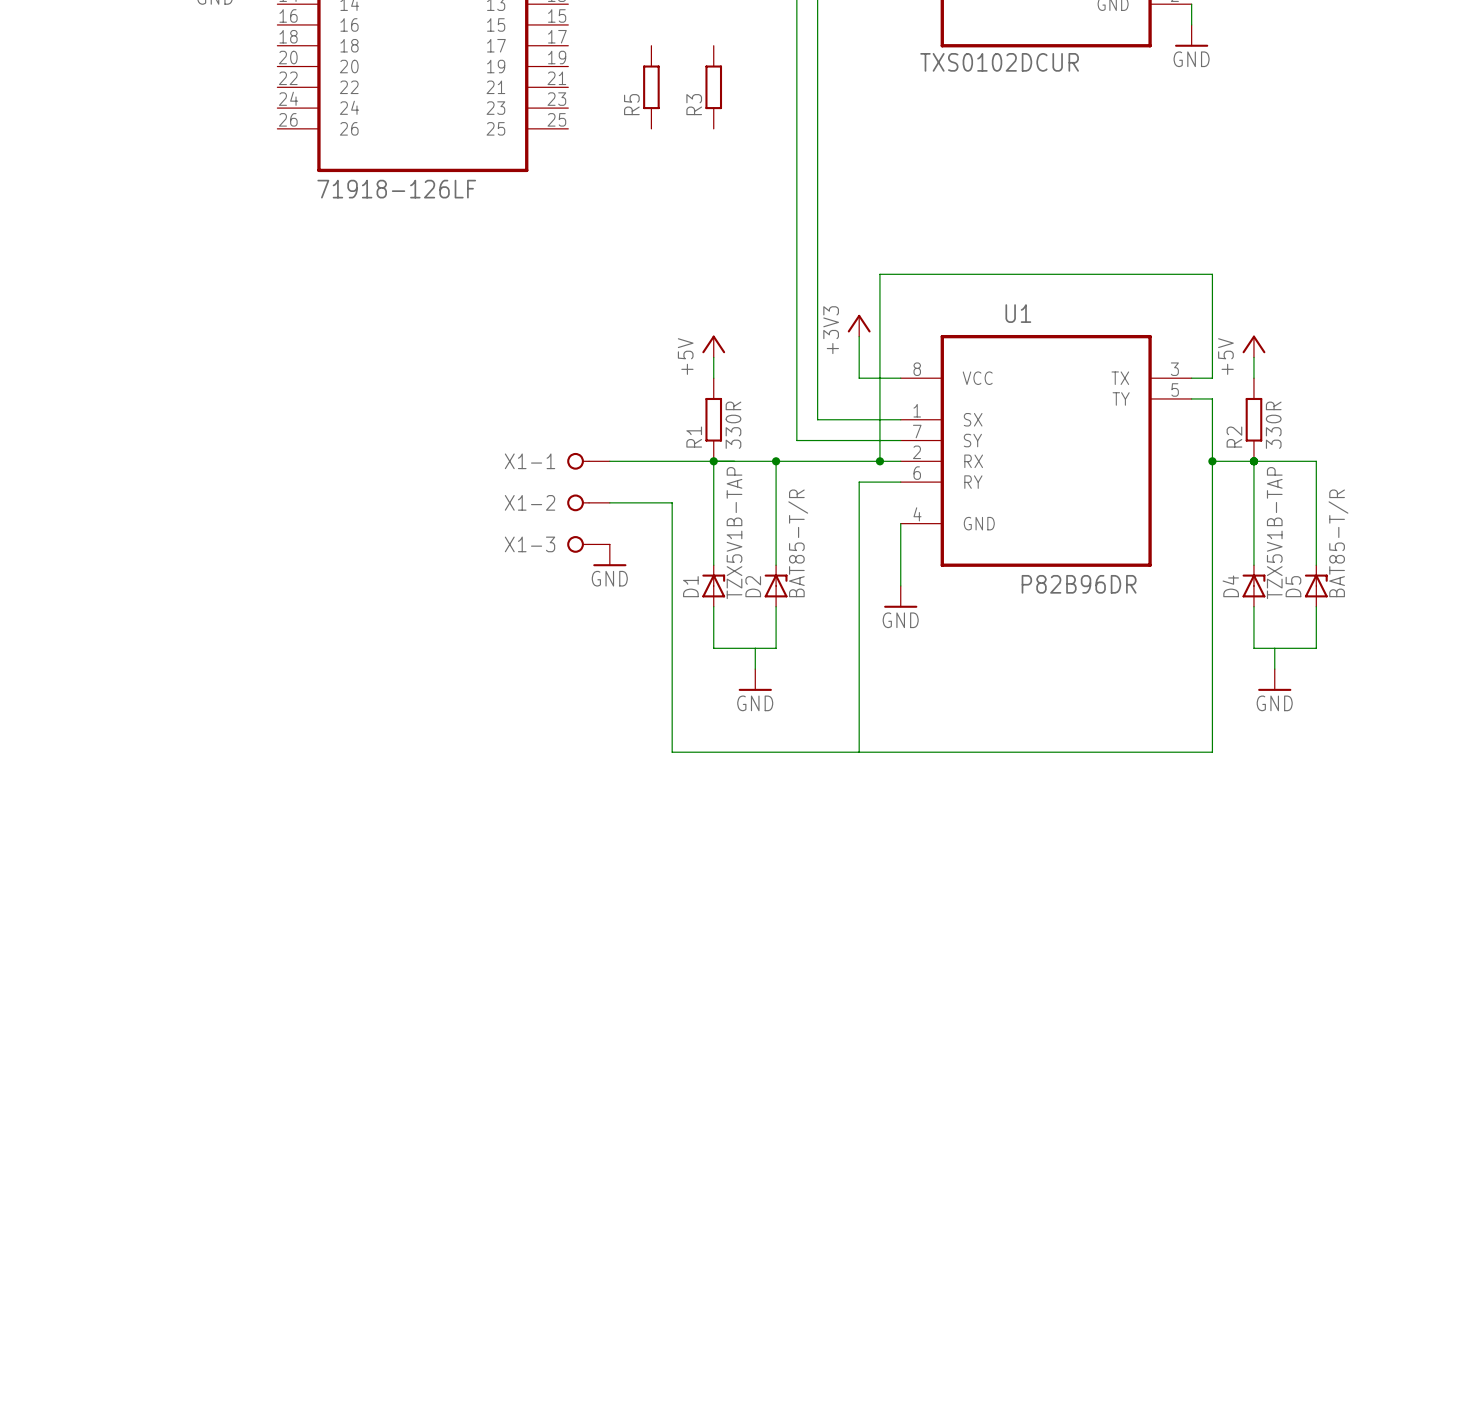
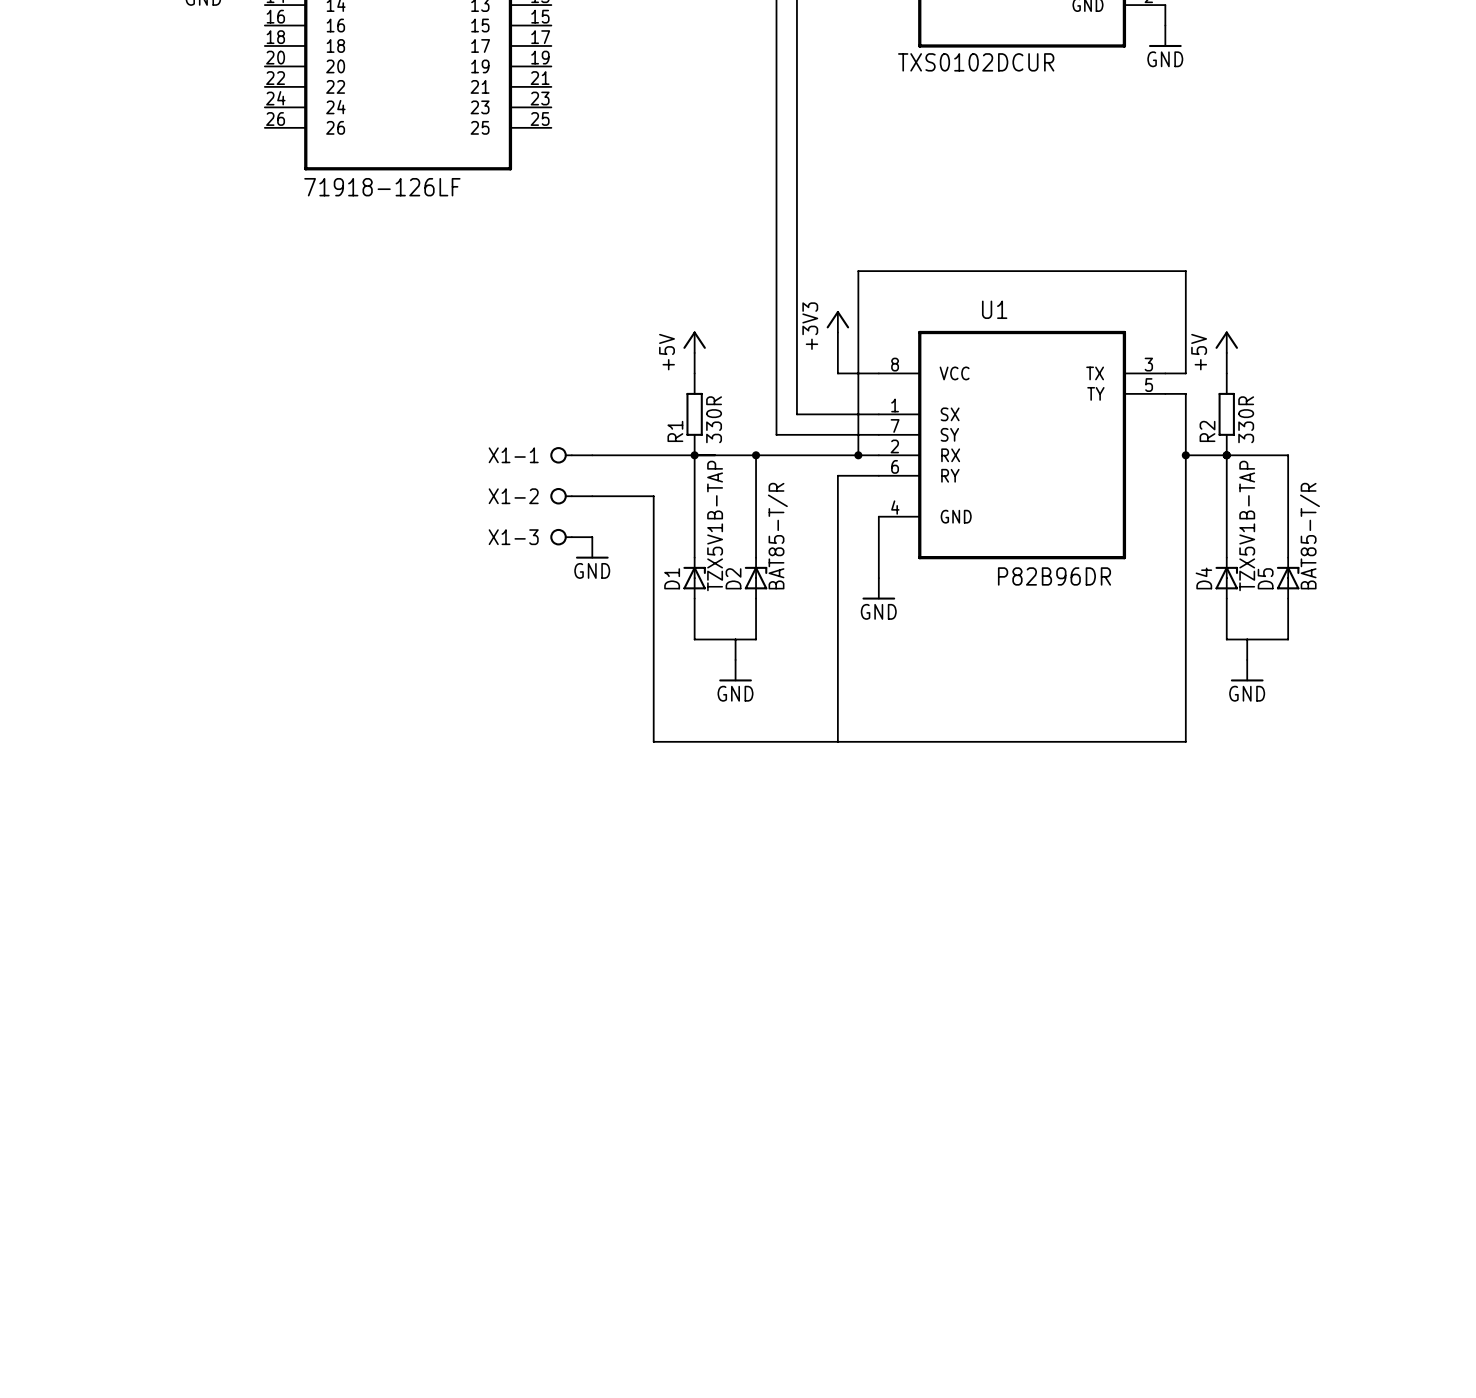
R5: (651, 87) -> none
R3: (713, 87) -> none

